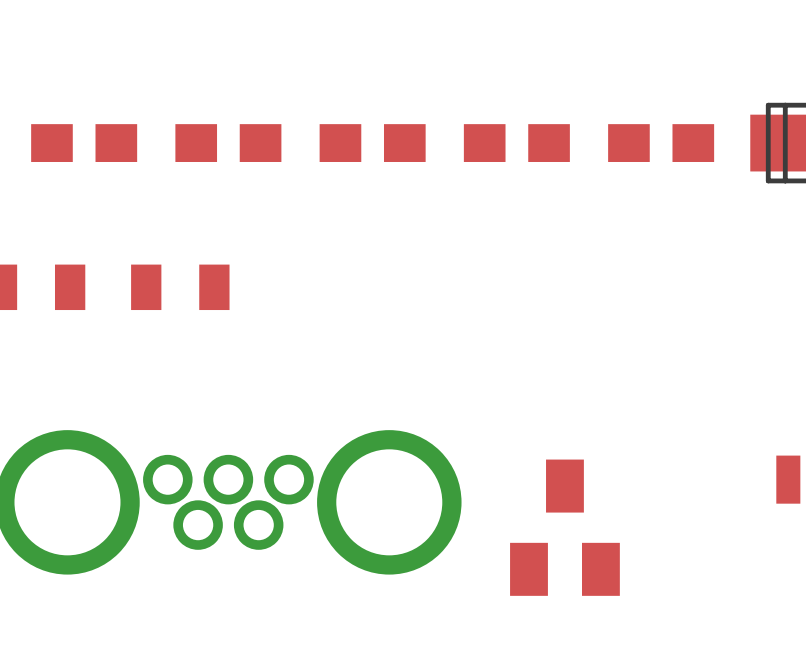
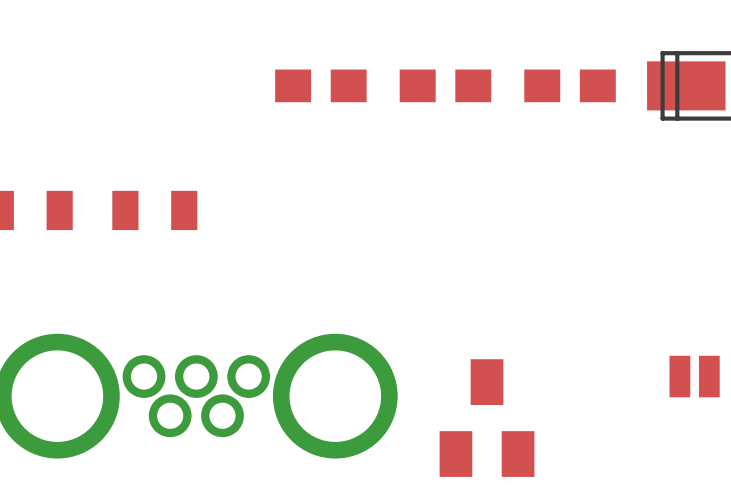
part: (84, 143) -> none
part: (228, 143) -> none

